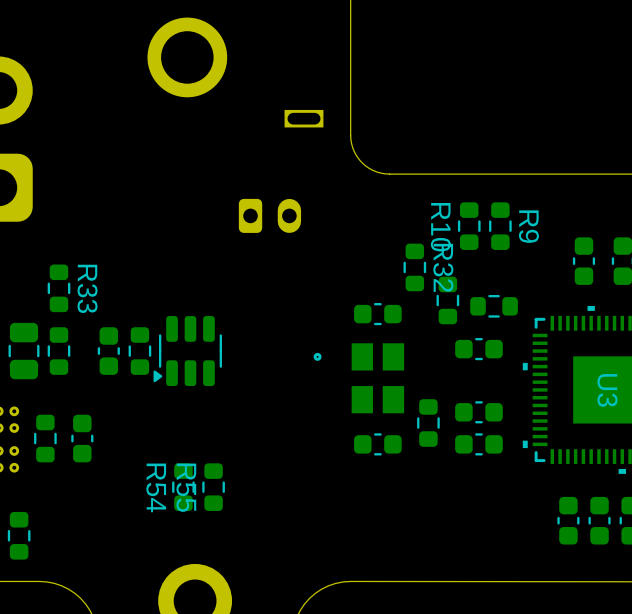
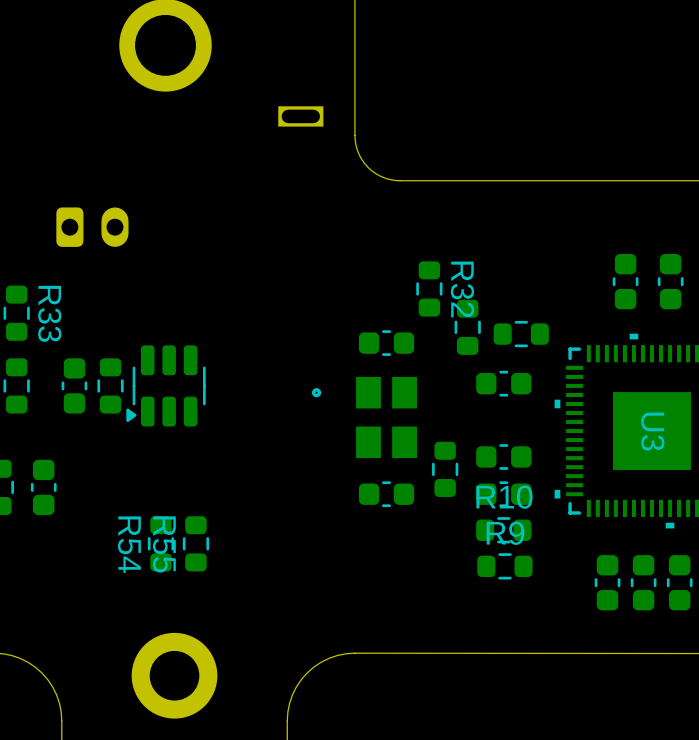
part position: (269, 215) -> (92, 227)
R10 rotation: 0° (469, 226) -> 90° clockwise (503, 530)
R10 position: (469, 226) -> (503, 530)
R9 rotation: 0° (500, 226) -> 90° clockwise (504, 566)
R9 position: (500, 226) -> (504, 566)
R9 name position: R9 (528, 226) -> R9 (505, 533)

